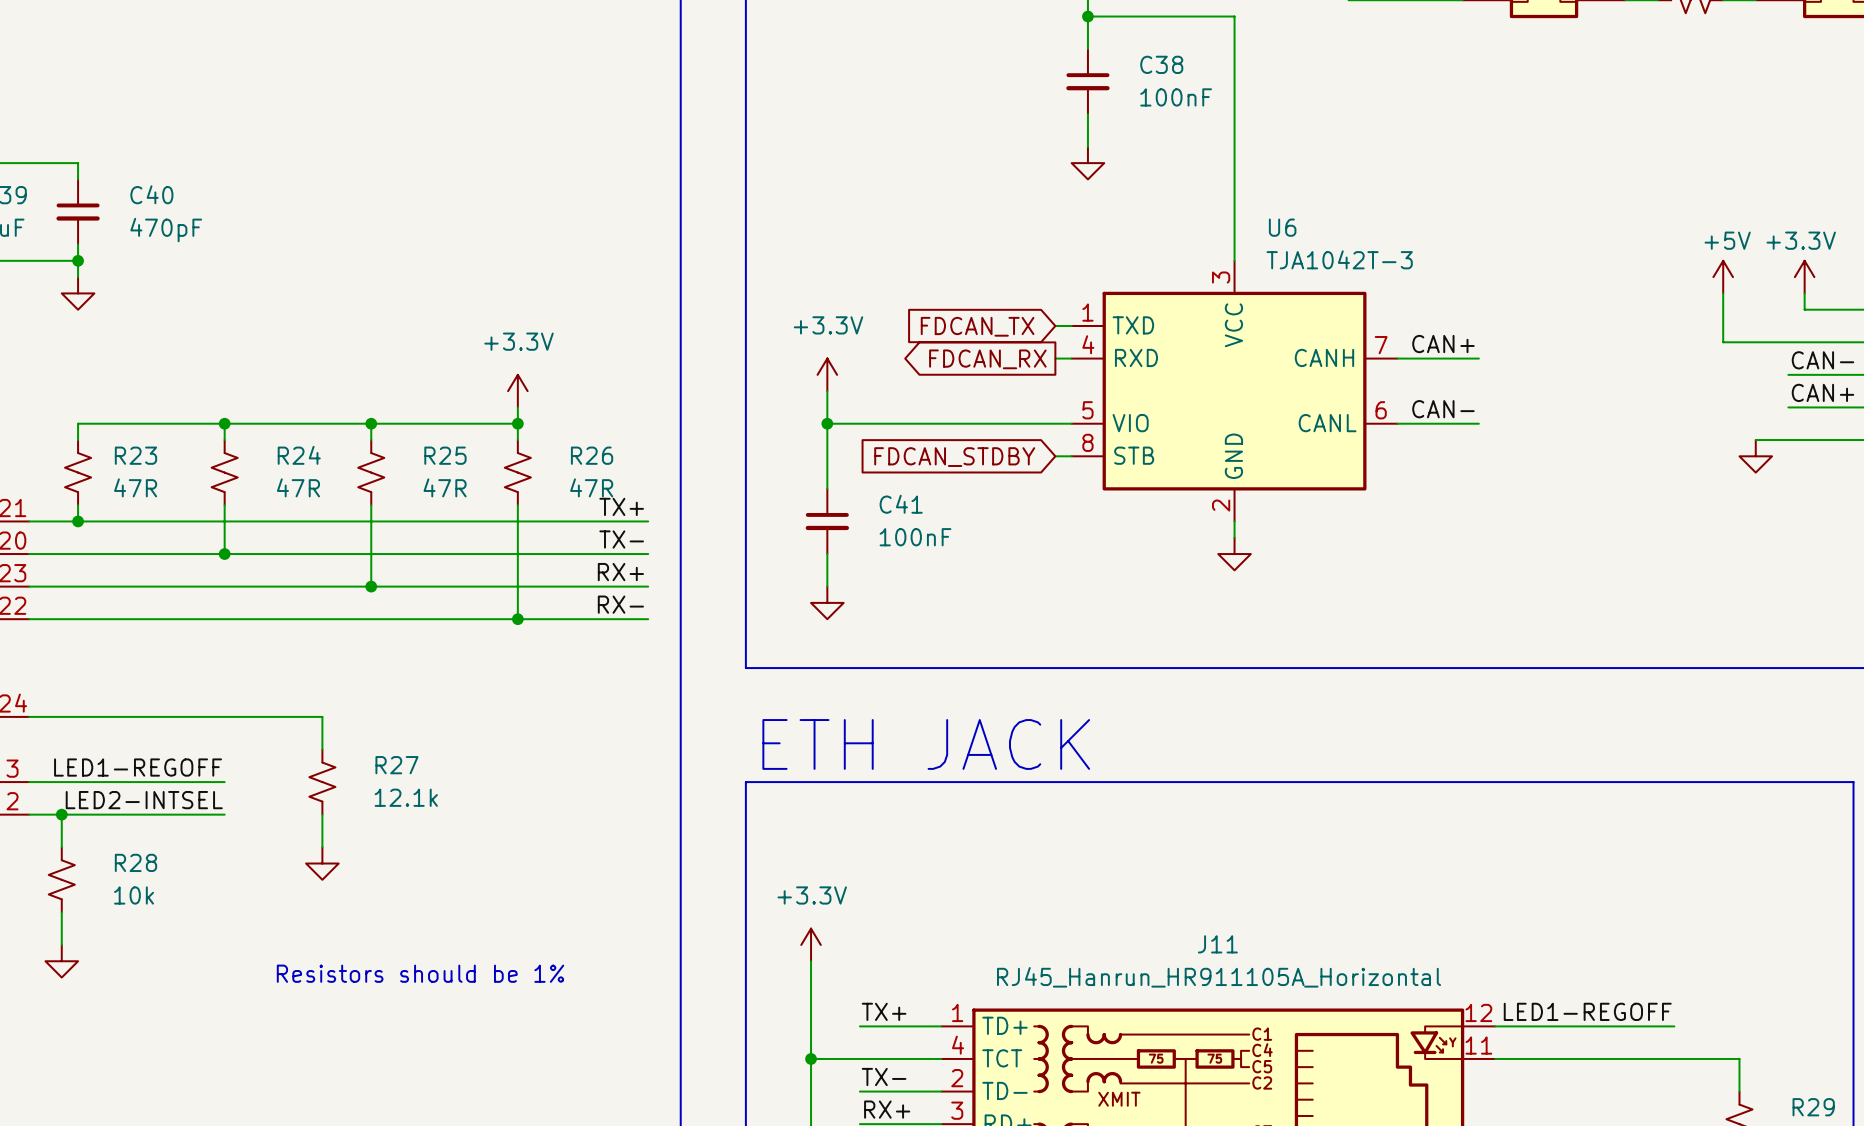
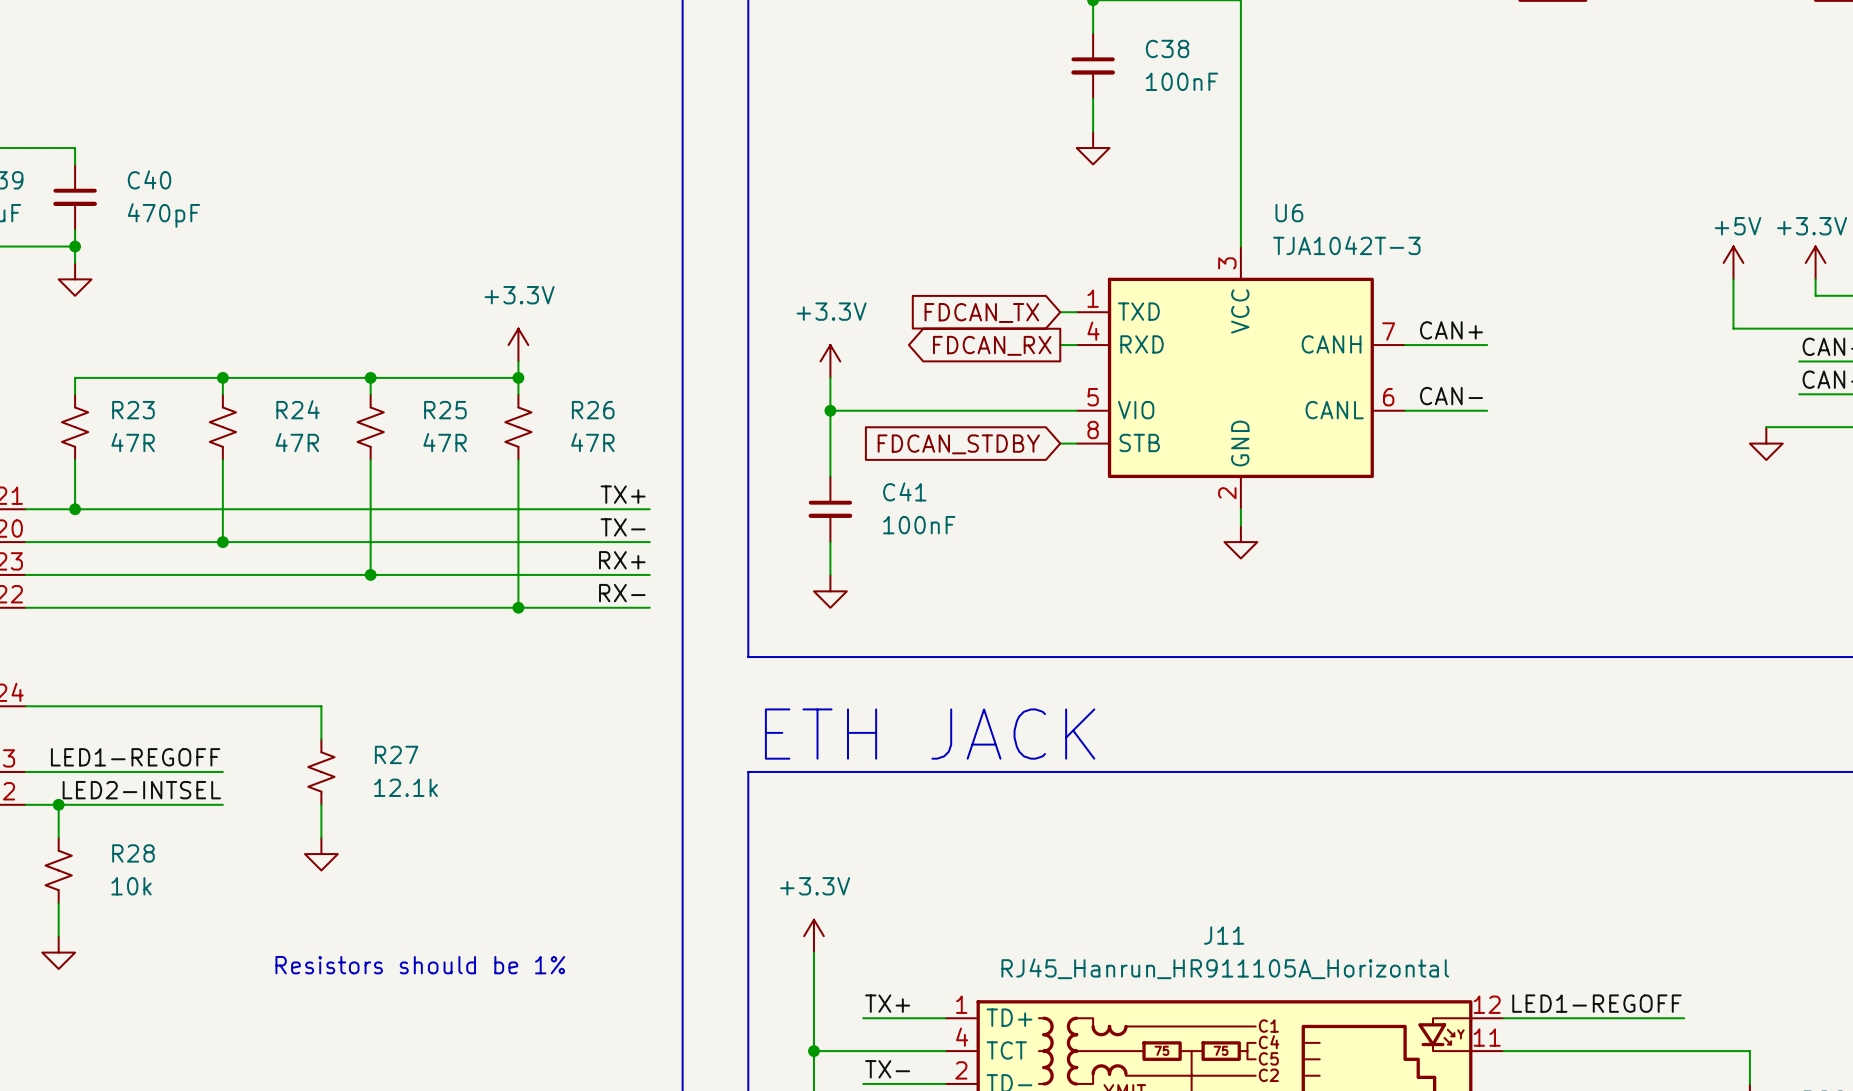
power symbol position: +3.3V (517, 391) -> +3.3V (518, 345)
wire: (224, 423) (224, 440) -> (222, 377) (222, 394)
junction position: (224, 423) -> (222, 377)
wire: (371, 423) (371, 440) -> (370, 377) (370, 394)
junction position: (371, 423) -> (370, 377)
wire: (517, 423) (78, 423) (78, 440) -> (518, 377) (75, 377) (75, 394)
junction position: (517, 423) -> (518, 377)
R23 position: (78, 472) -> (75, 427)
R24 position: (224, 472) -> (222, 427)
R25 position: (371, 472) -> (370, 427)
R26 position: (517, 472) -> (518, 427)

